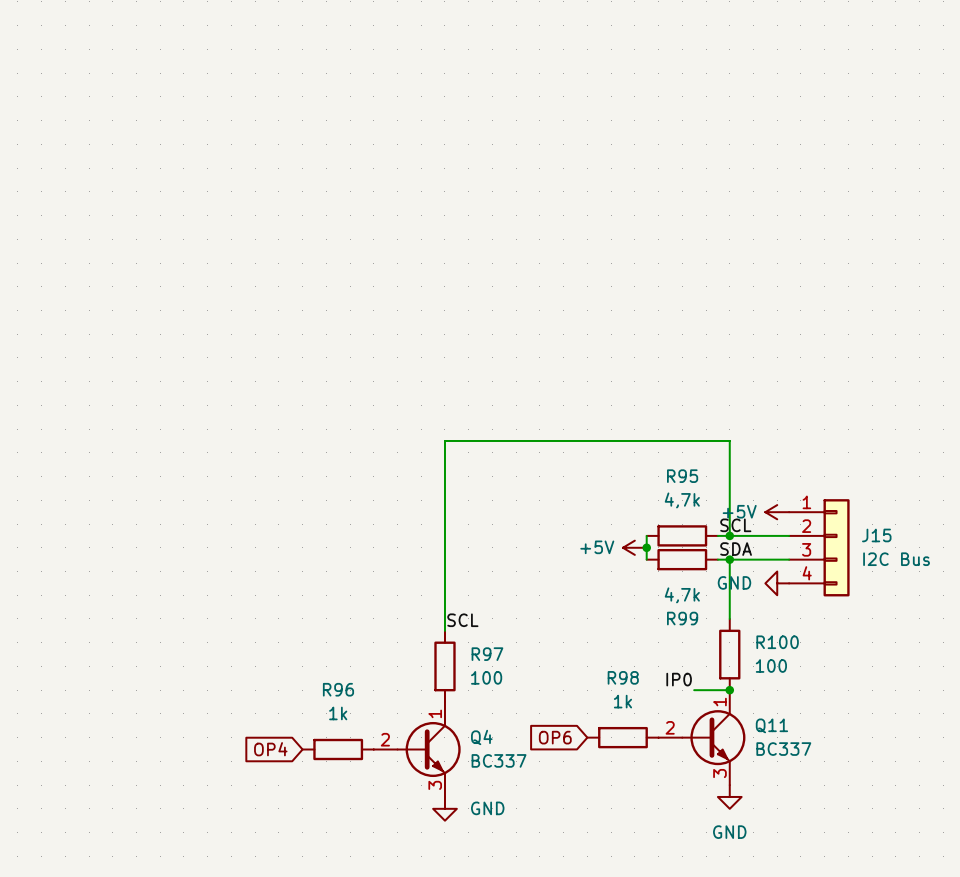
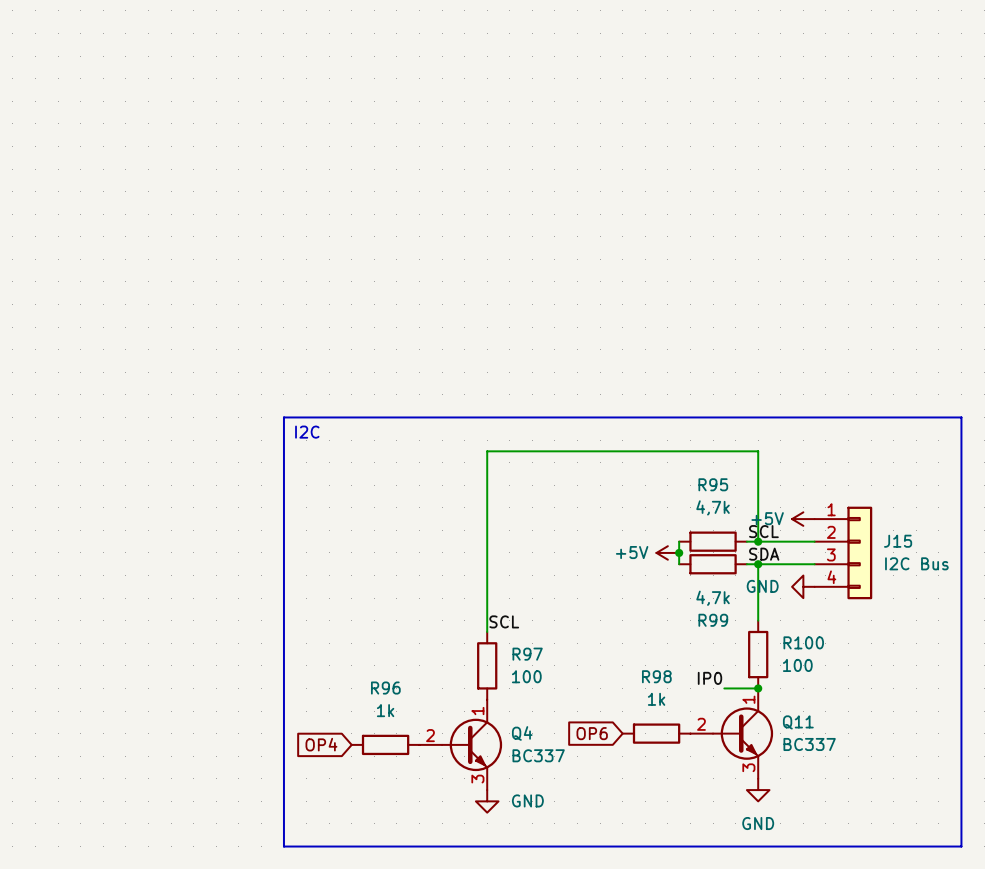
line: none -> (283, 417) (961, 417) (961, 846) (283, 846) (283, 417)
text: none -> I2C (307, 432)

